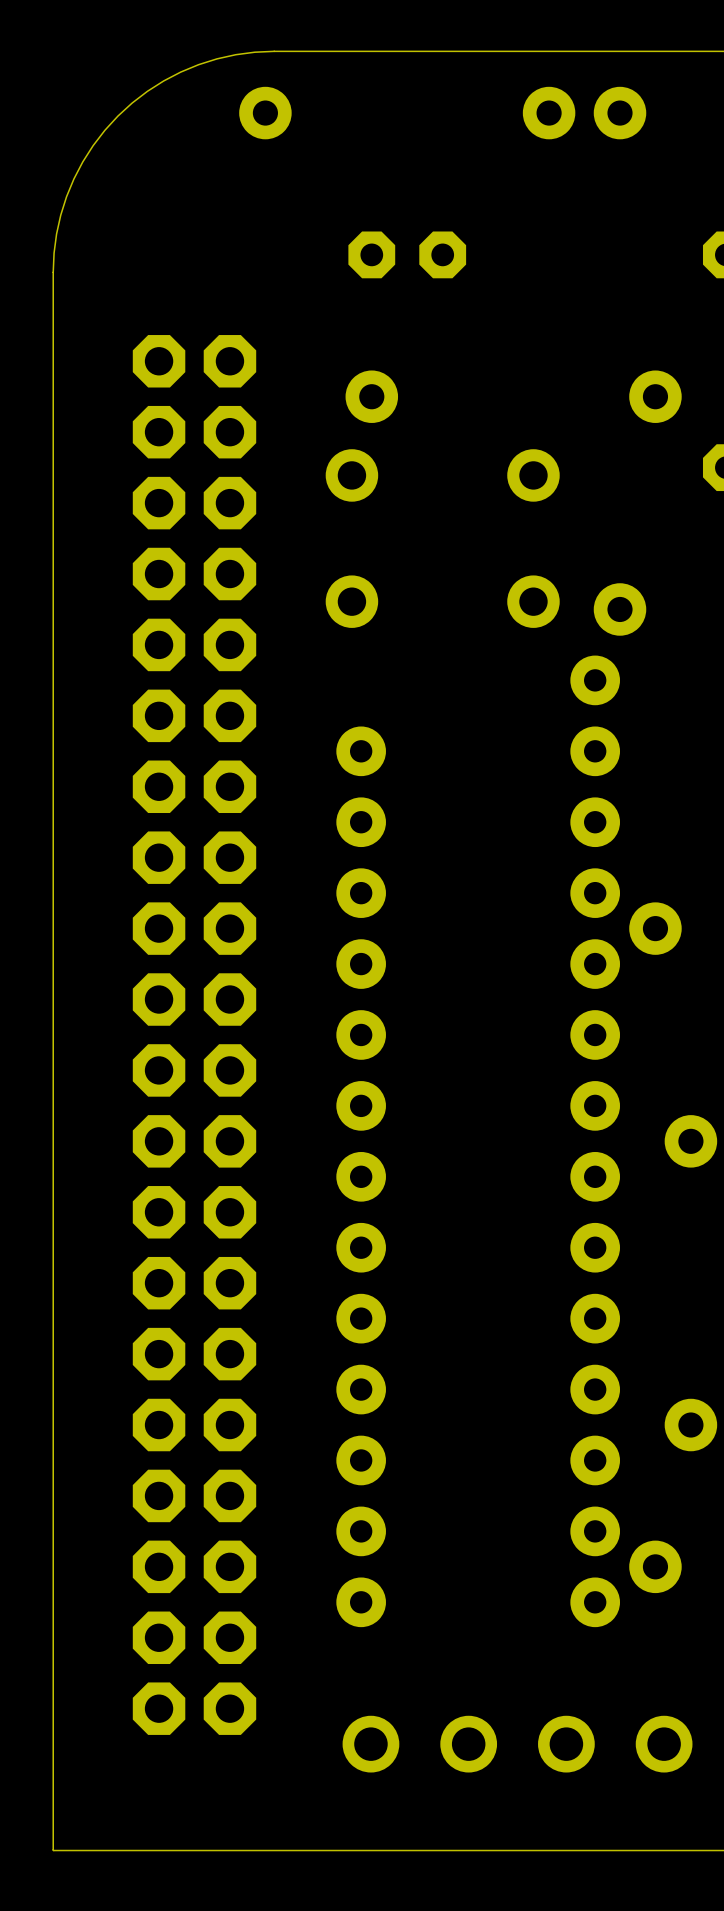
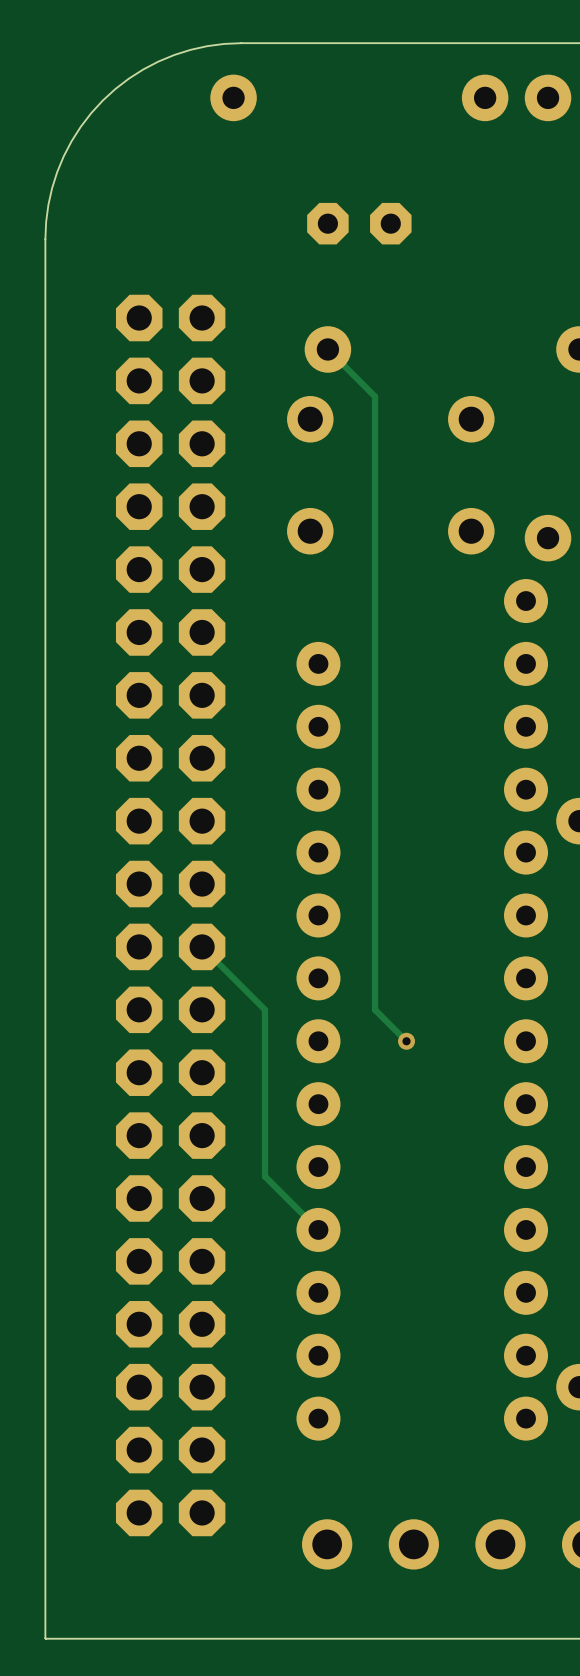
track: none -> (327, 349) (375, 396) (375, 1009) (406, 1041)
track: none -> (202, 946) (265, 1009) (265, 1176) (318, 1229)
via: none -> (406, 1041)

